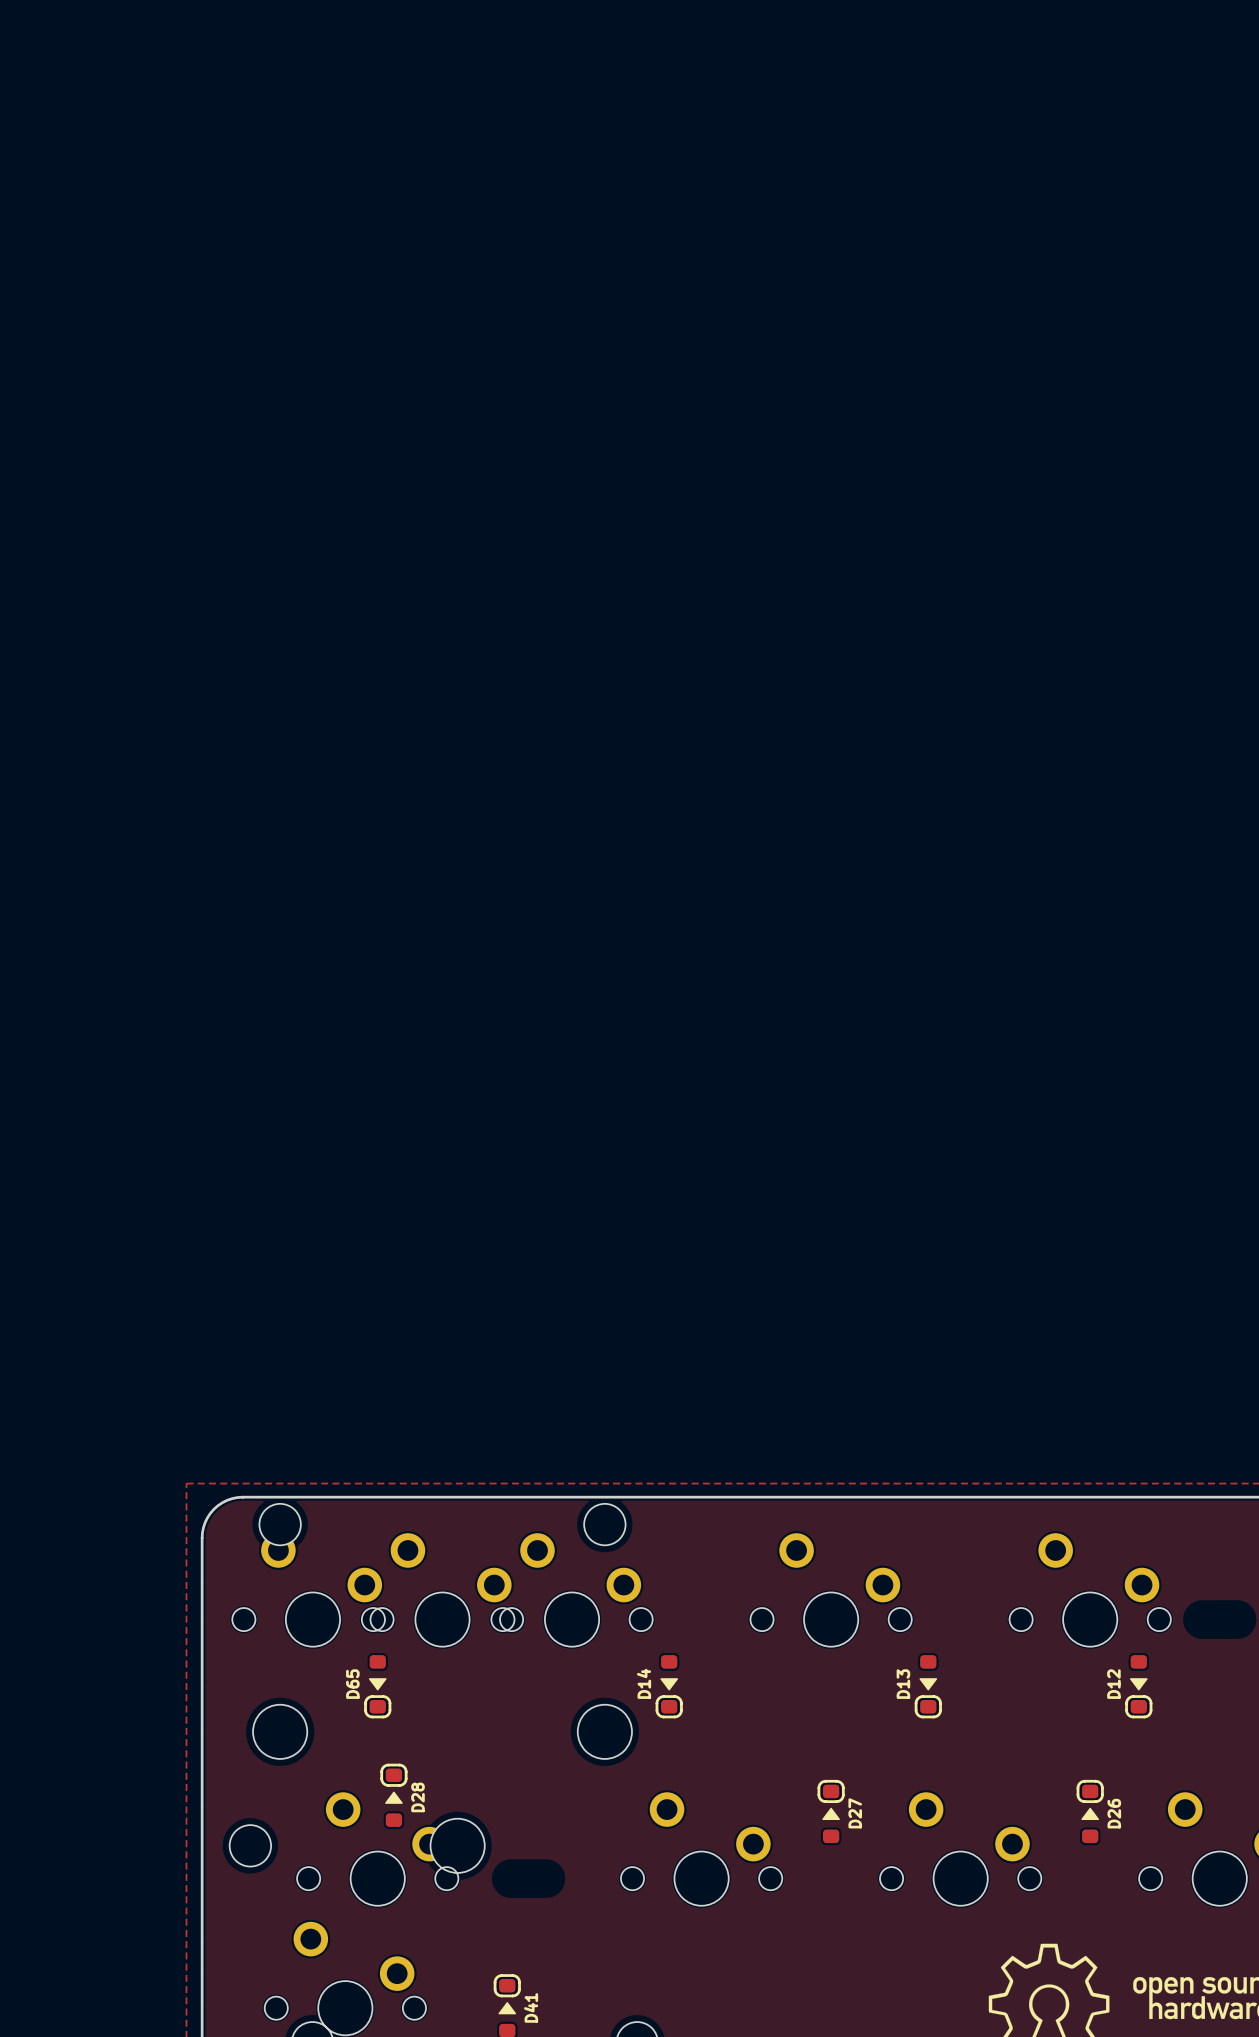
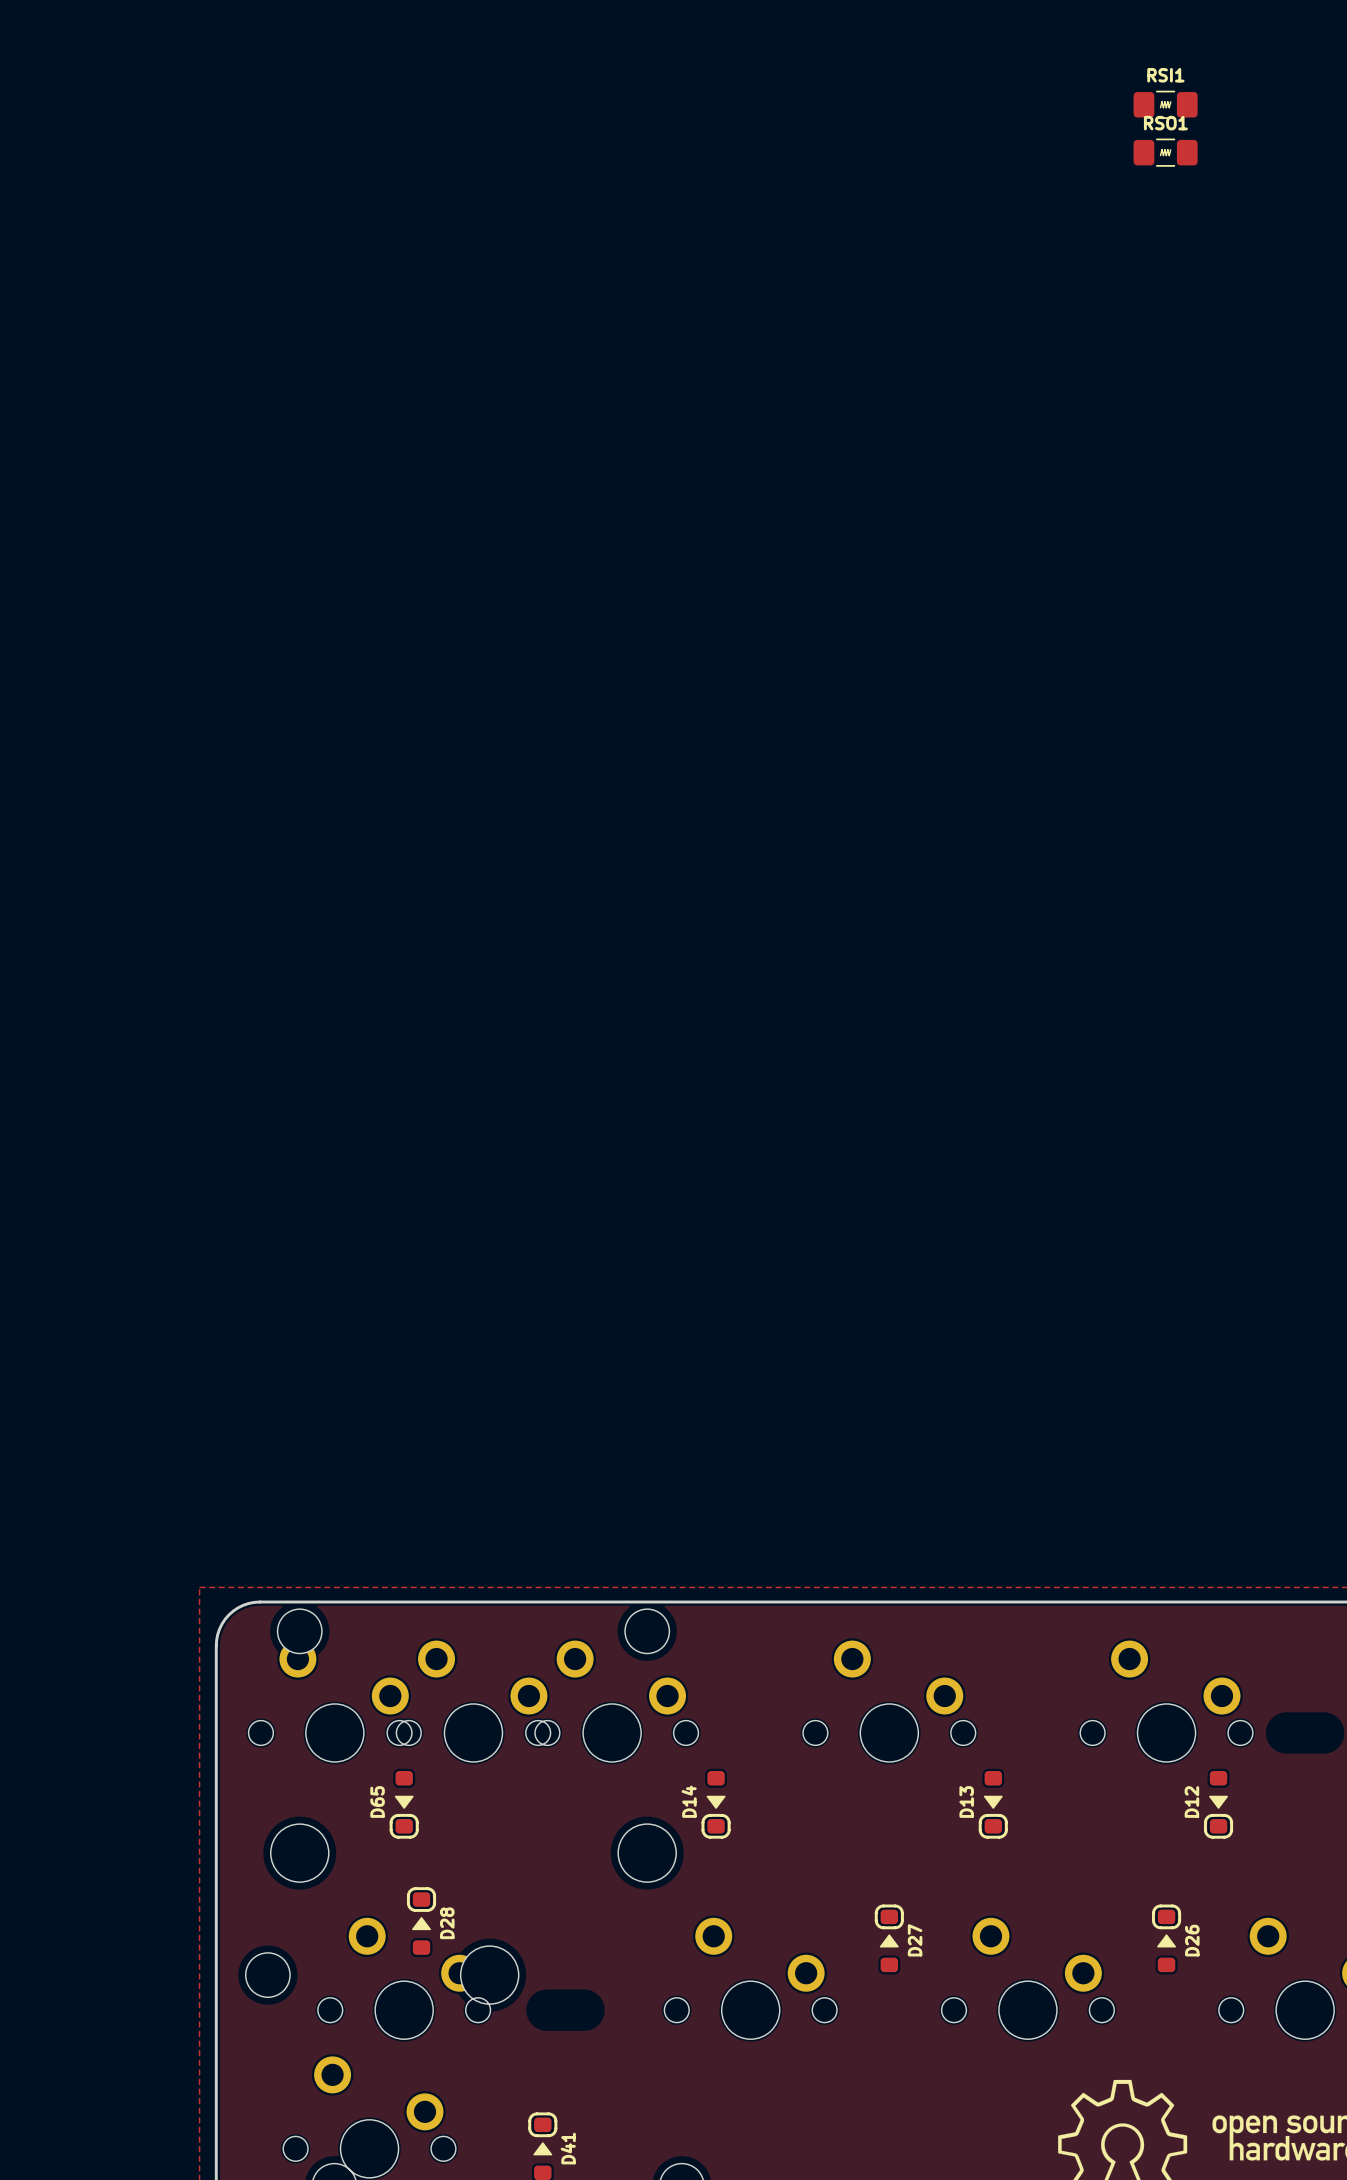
RSI1: none -> (1165, 104)
RSO1: none -> (1165, 152)

